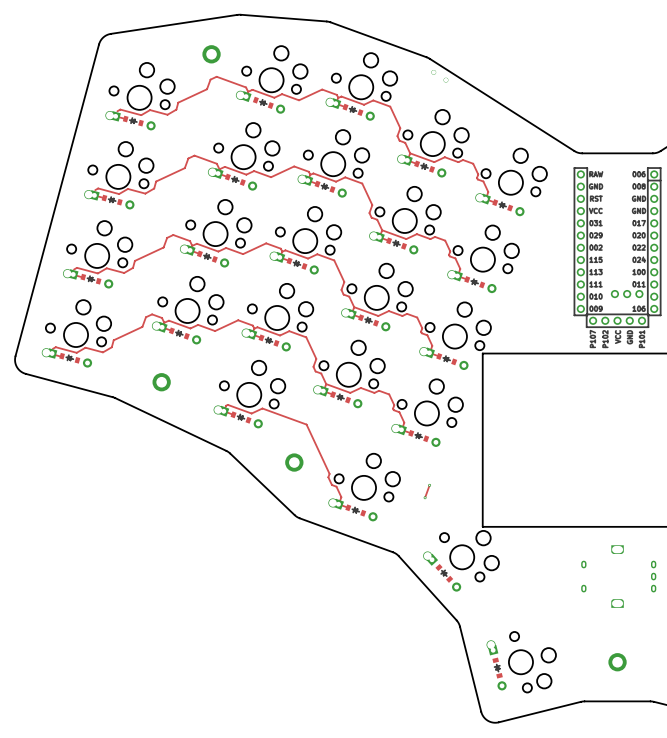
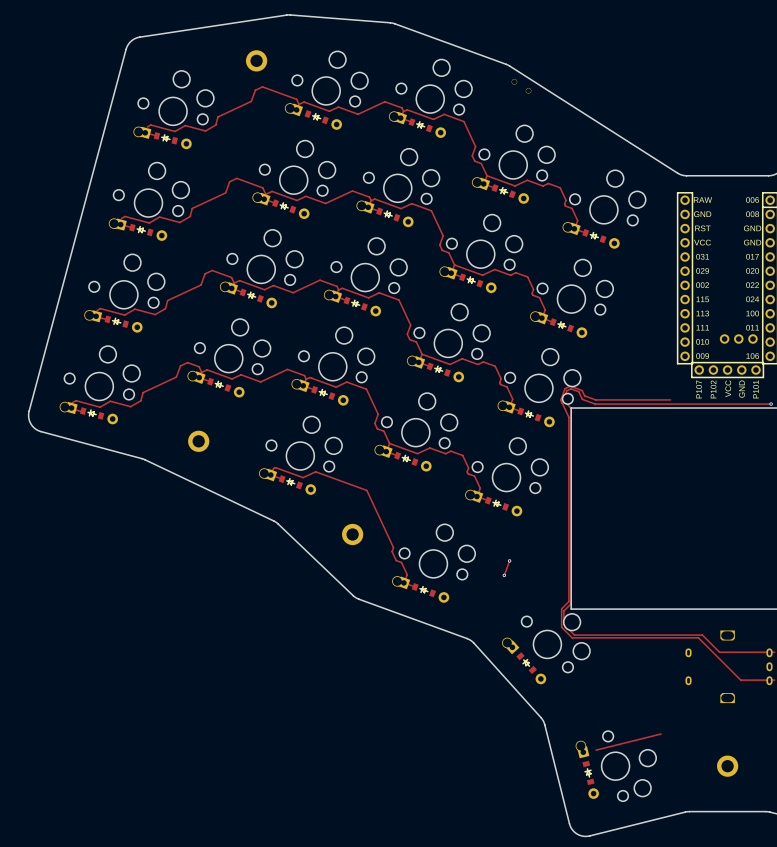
track: none -> (566, 390) (563, 400) (571, 408) (571, 603) (563, 611) (563, 624) (574, 635) (702, 635) (719, 652) (774, 652)
track: none -> (567, 390) (570, 388) (578, 391) (582, 399) (595, 404) (771, 404)
track: none -> (670, 399) (595, 399) (584, 395) (582, 390) (570, 386) (564, 388) (560, 400) (568, 417) (568, 601) (561, 608) (561, 627) (572, 637) (698, 637) (740, 680) (774, 680)
via: none -> (771, 404)
track: none -> (661, 733) (596, 750)

